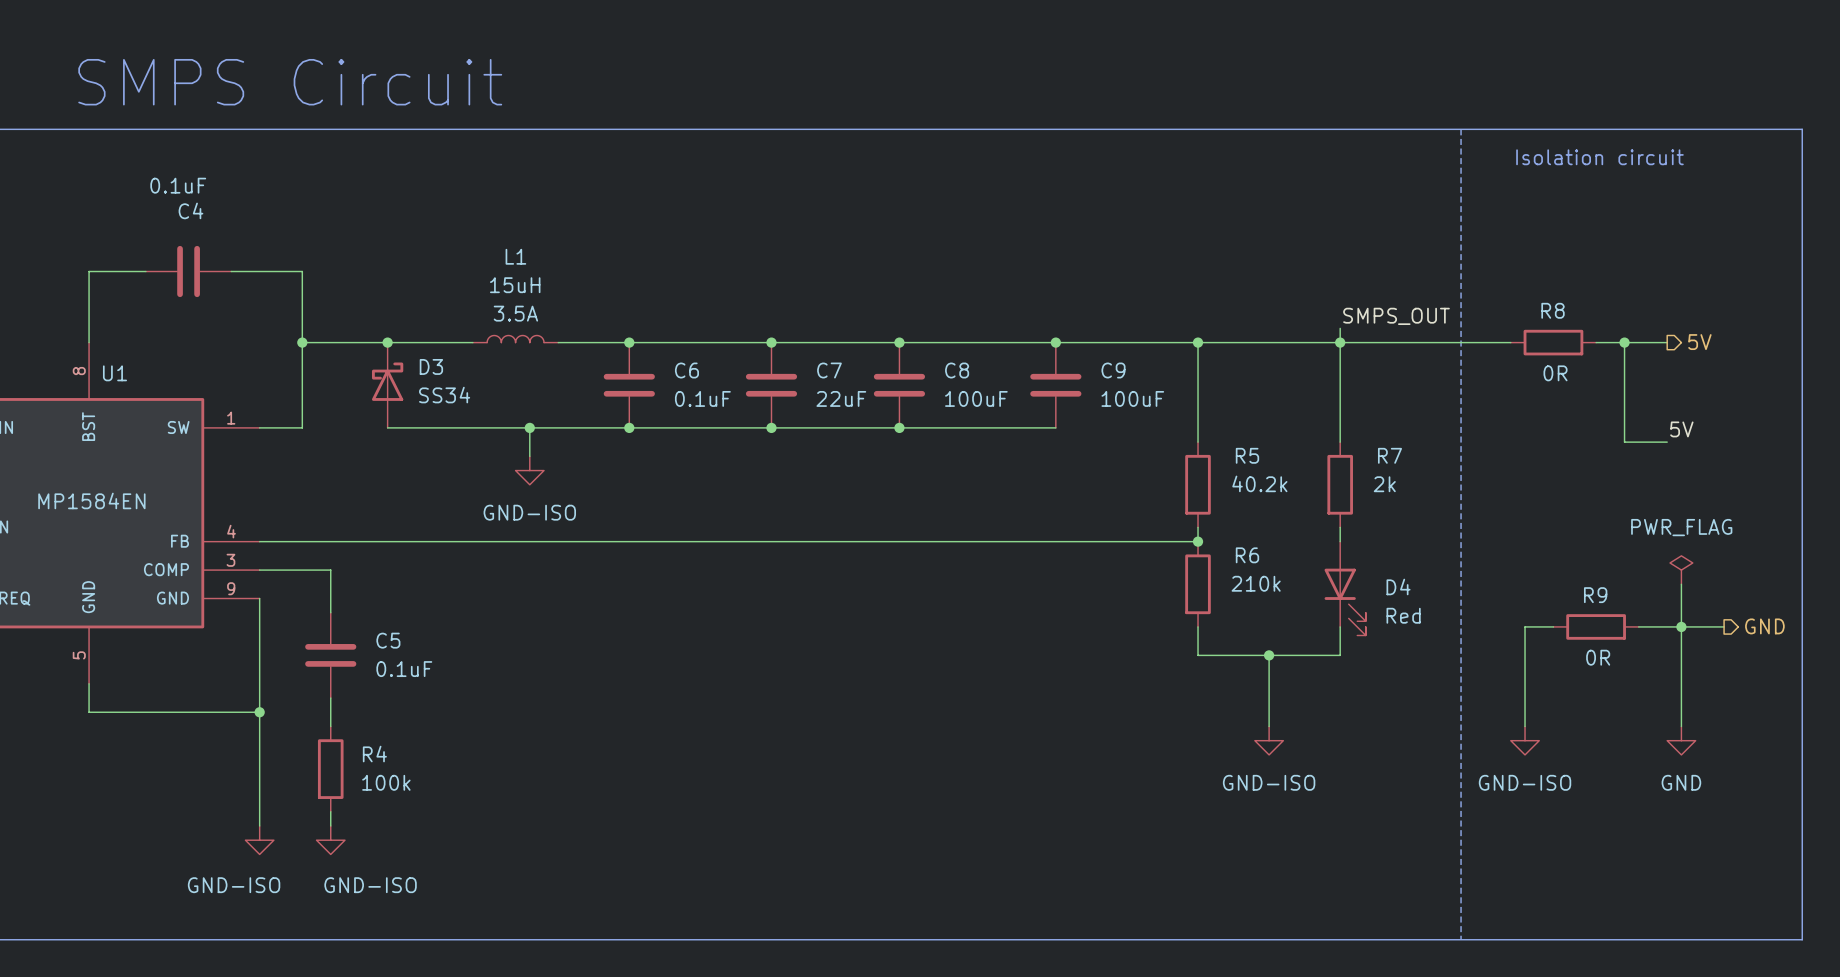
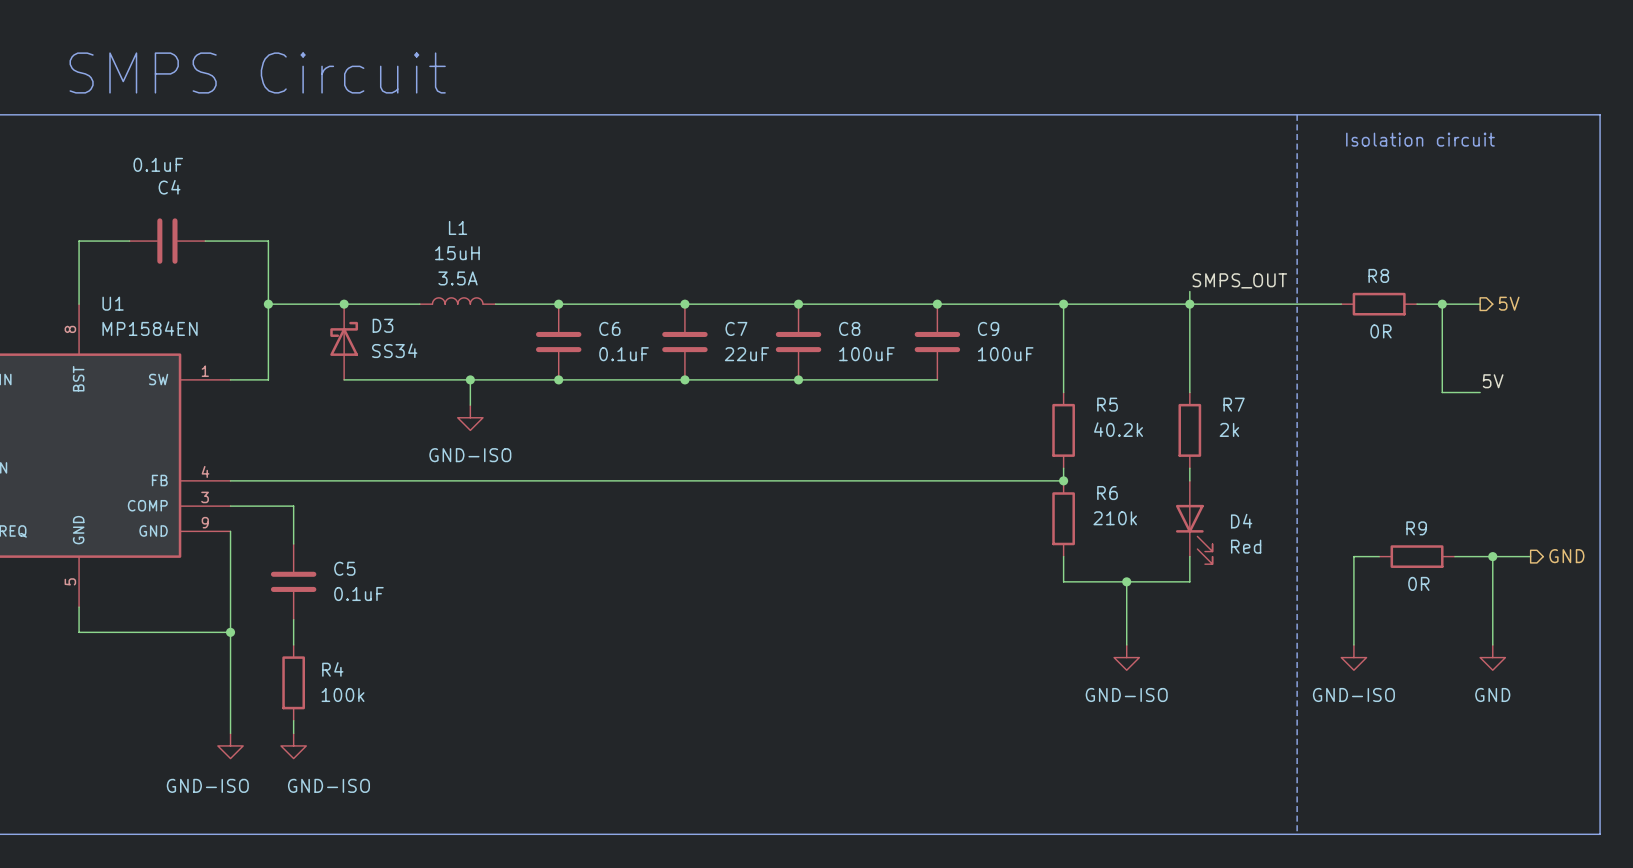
U1 name position: U1 (114, 373) -> U1 (113, 303)
U1 value position: MP1584EN (91, 500) -> MP1584EN (150, 328)
power symbol: PWR_FLAG (1681, 570) -> none
wire: (1681, 584) (1681, 626) -> none

